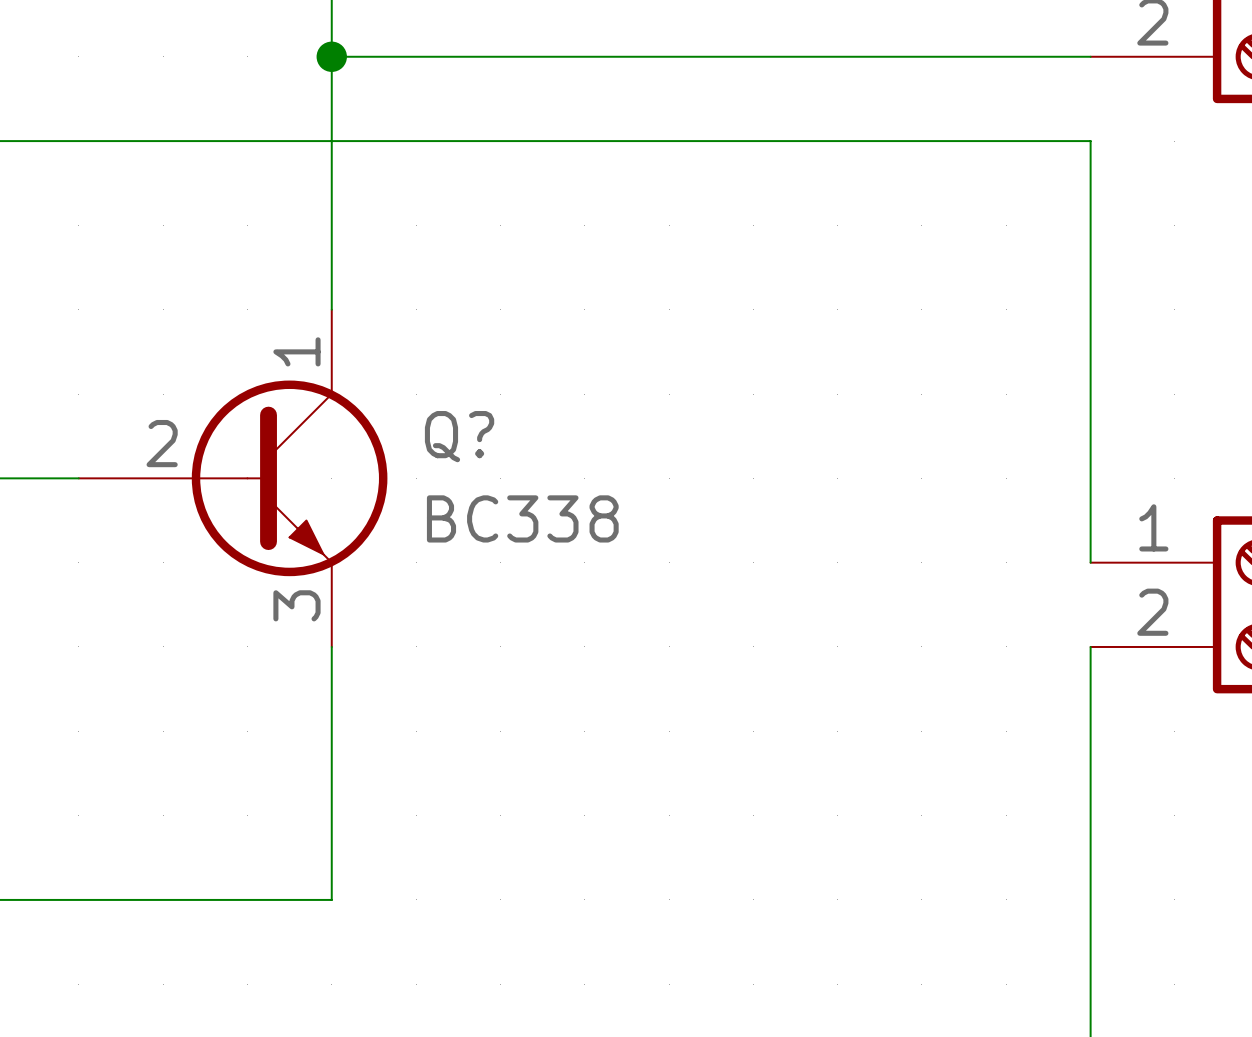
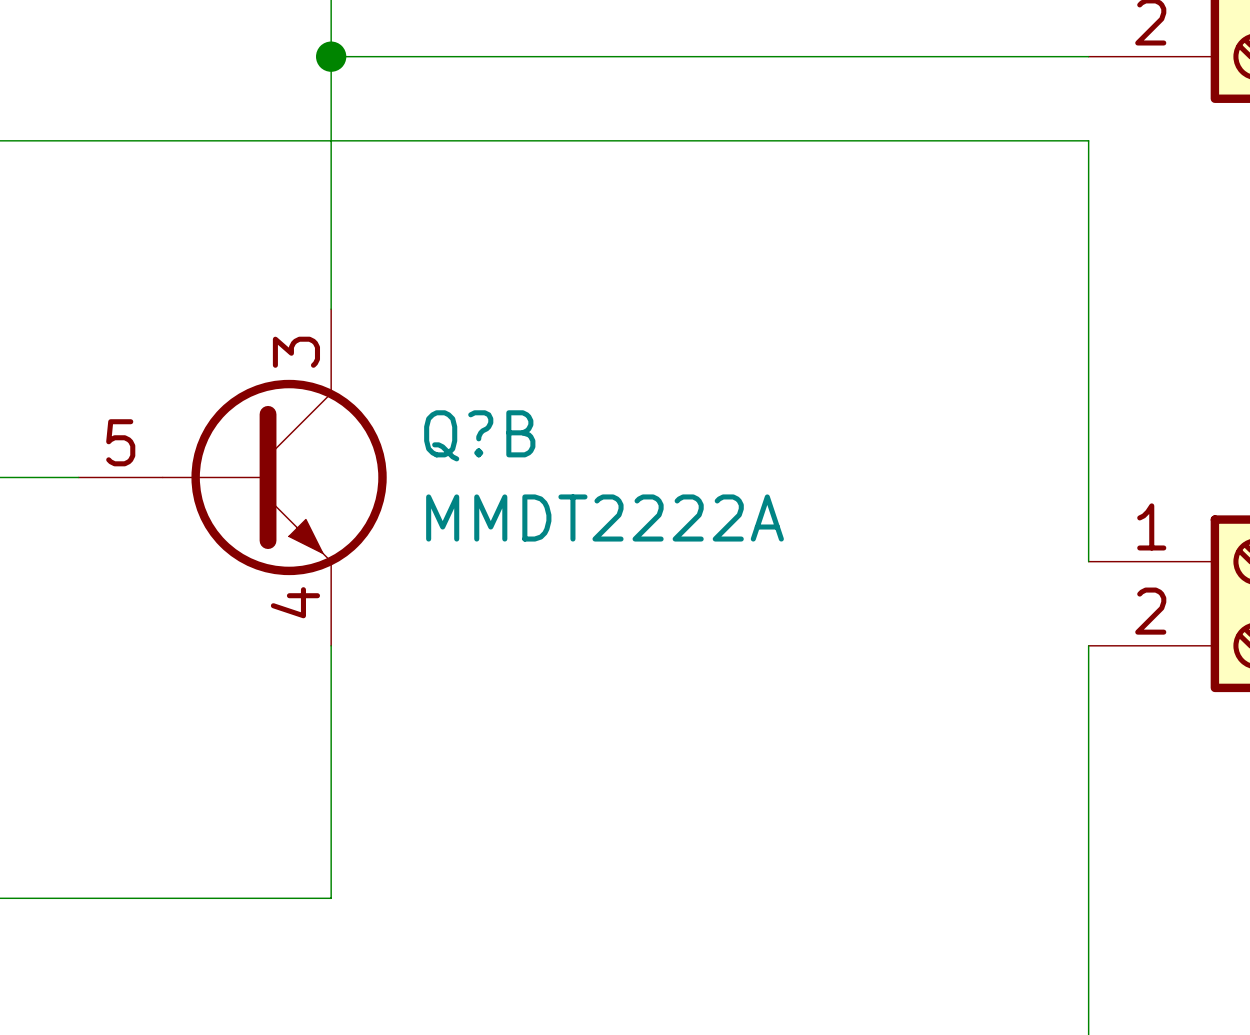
Q?: BC338 (233, 478) -> none
Q?B: none -> MMDT2222A (232, 477)

